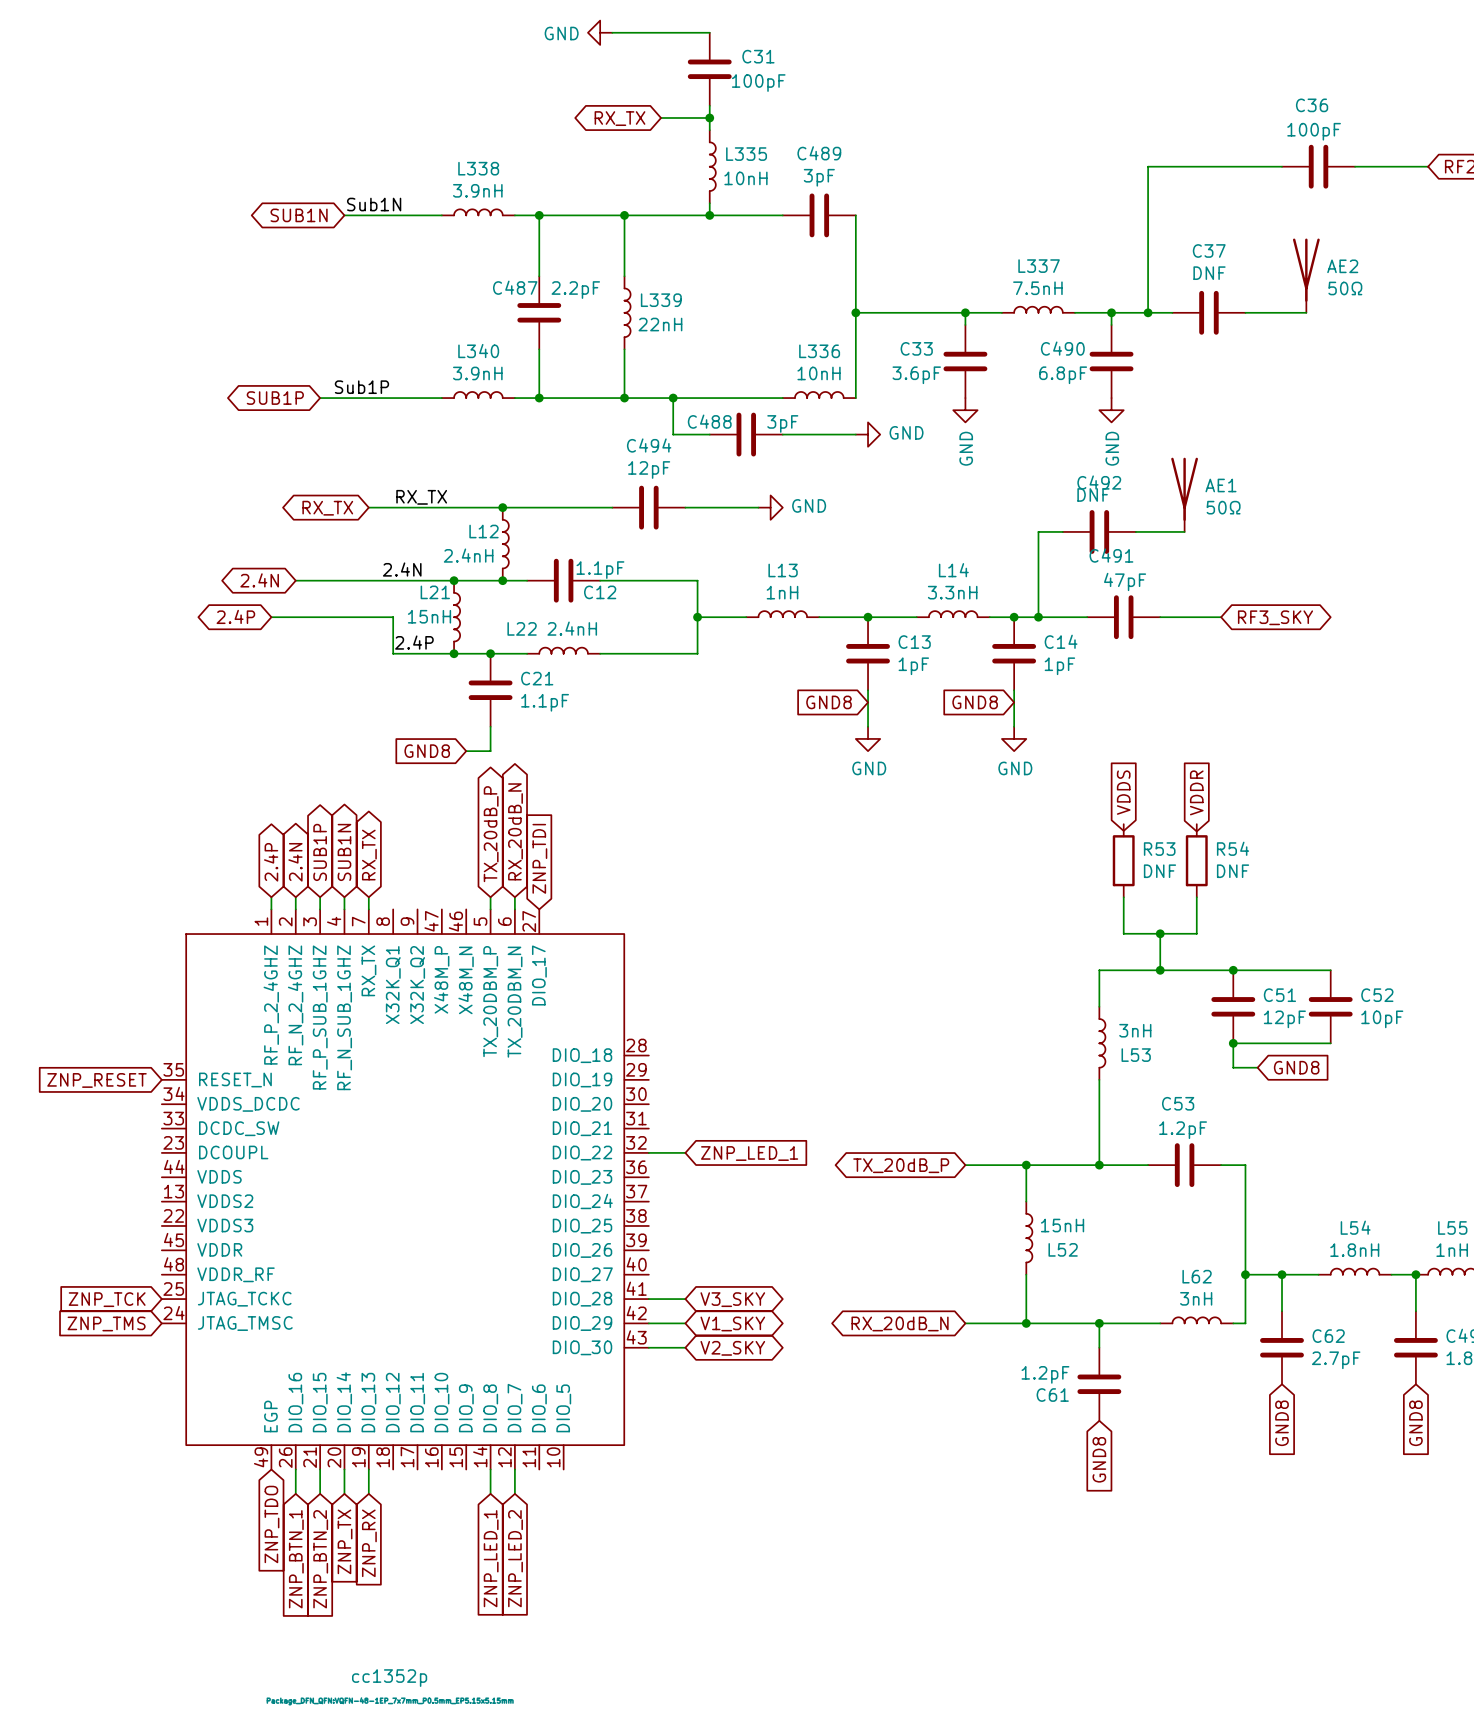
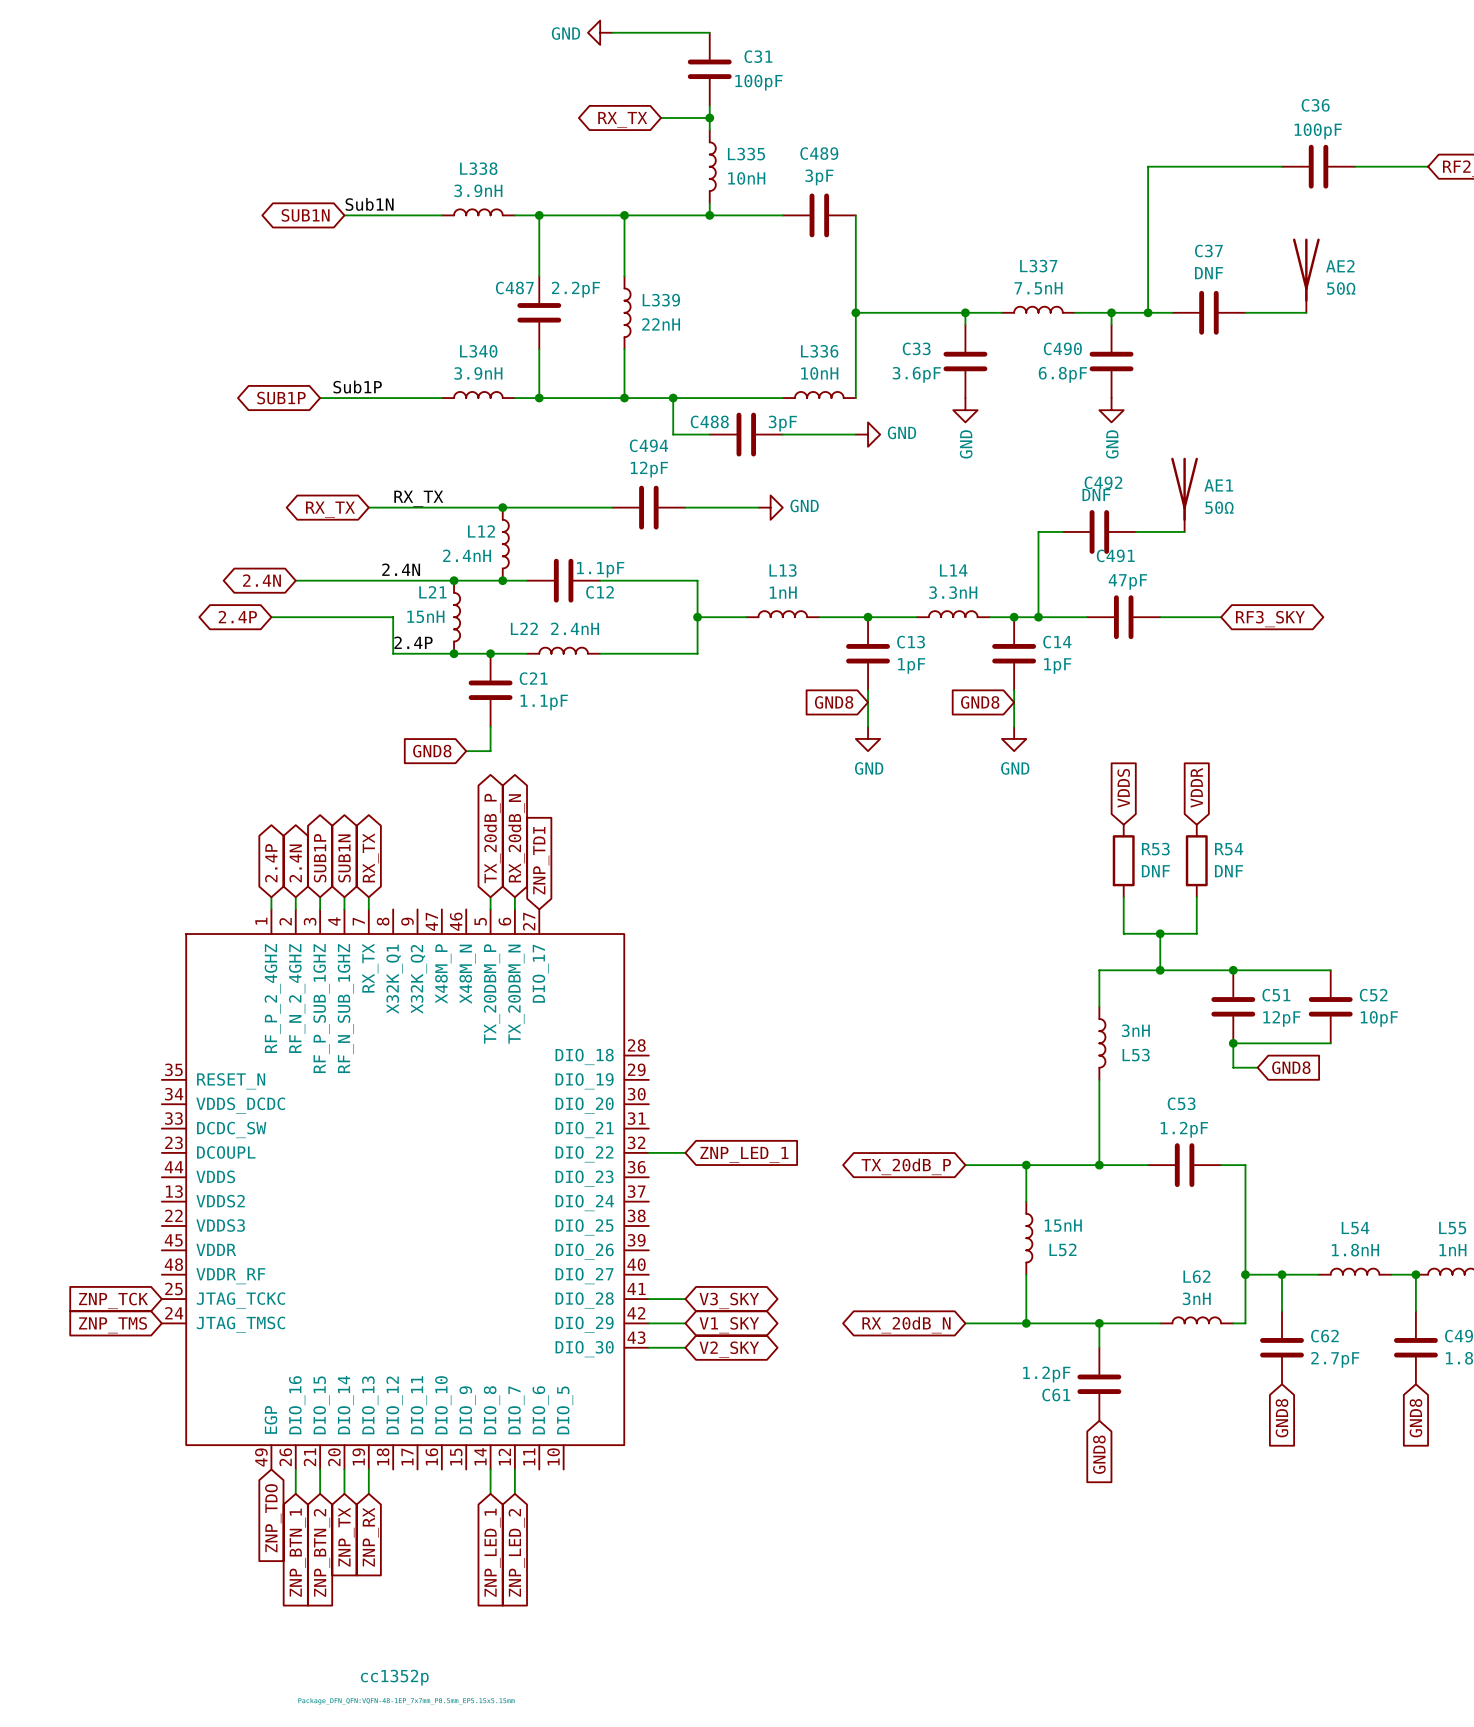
global label: ZNP_RESET (97, 1080) -> none

